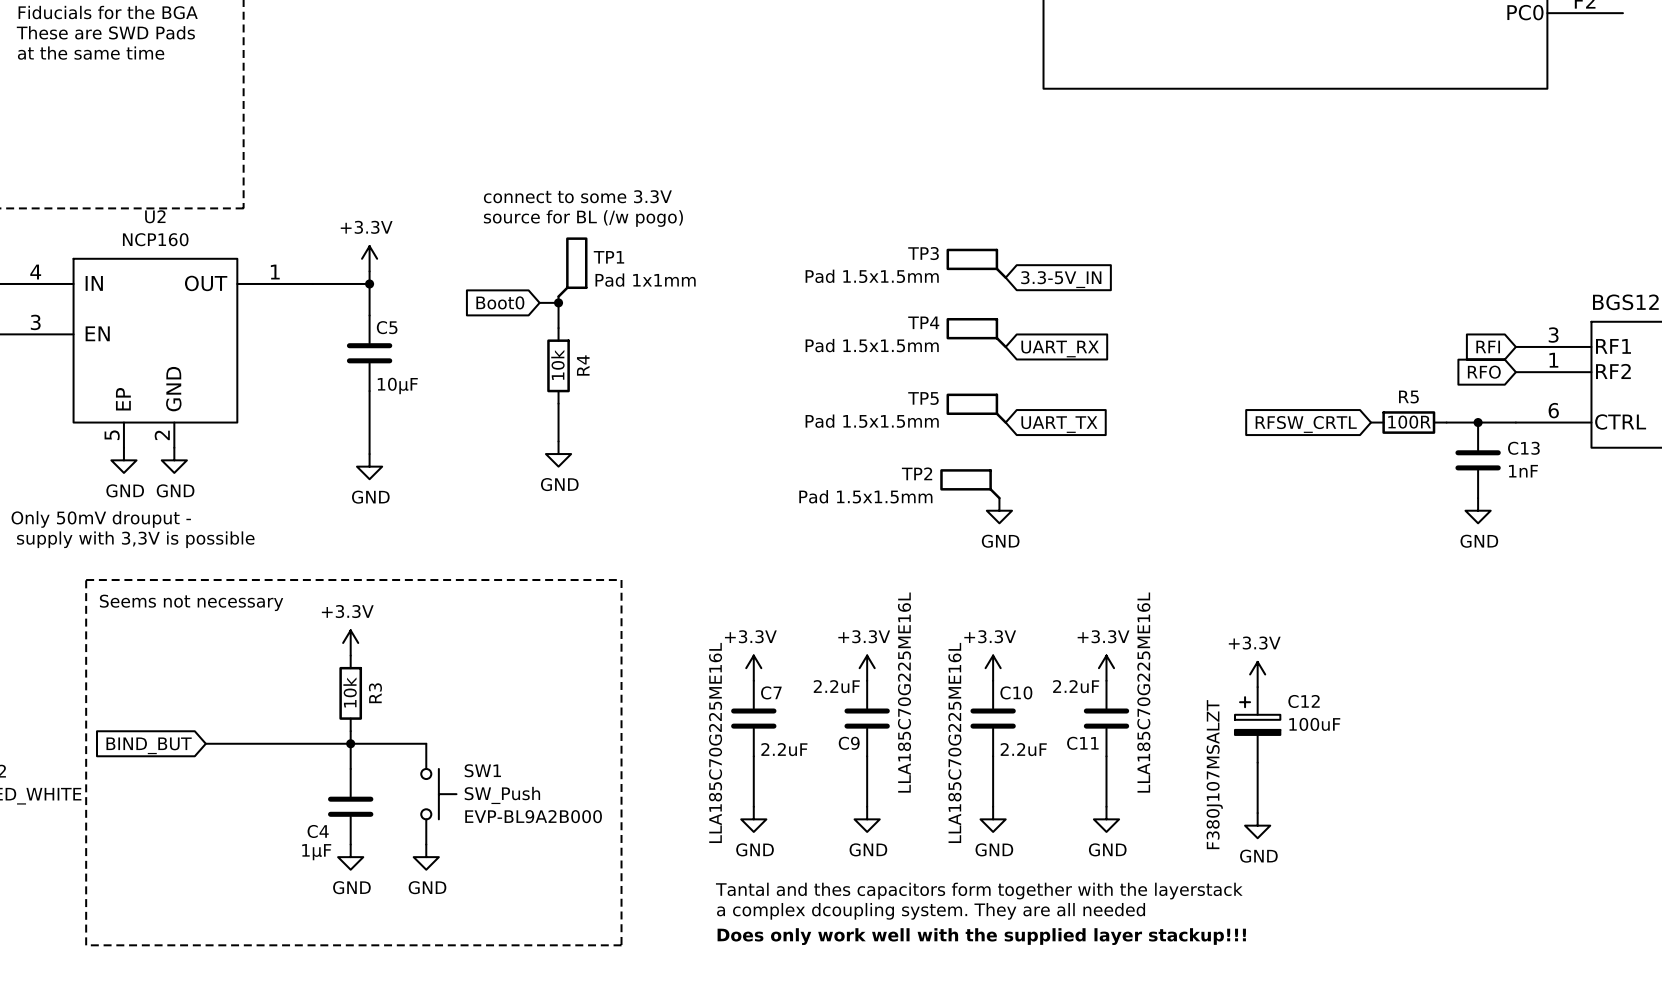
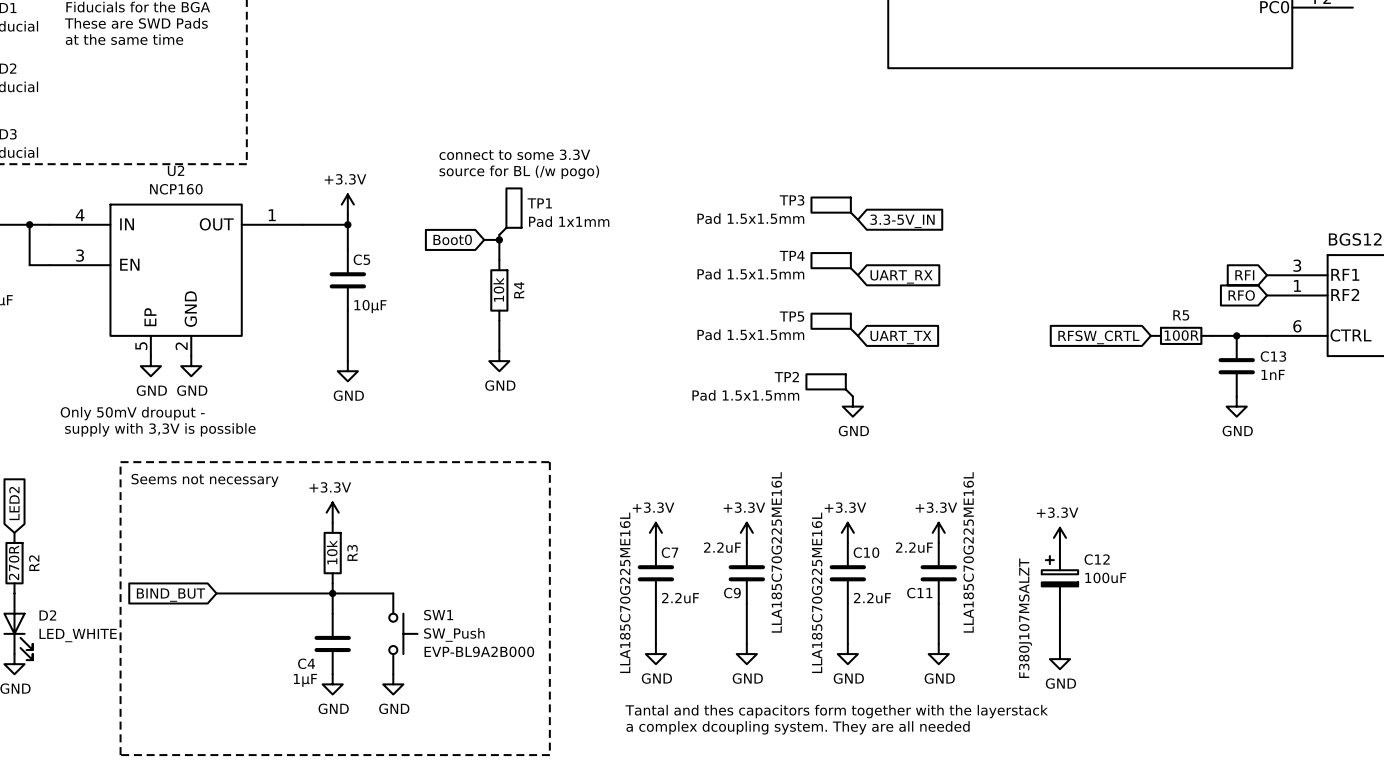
text: Does only work well with the supplied layer stackup!!! (981, 936) -> none

